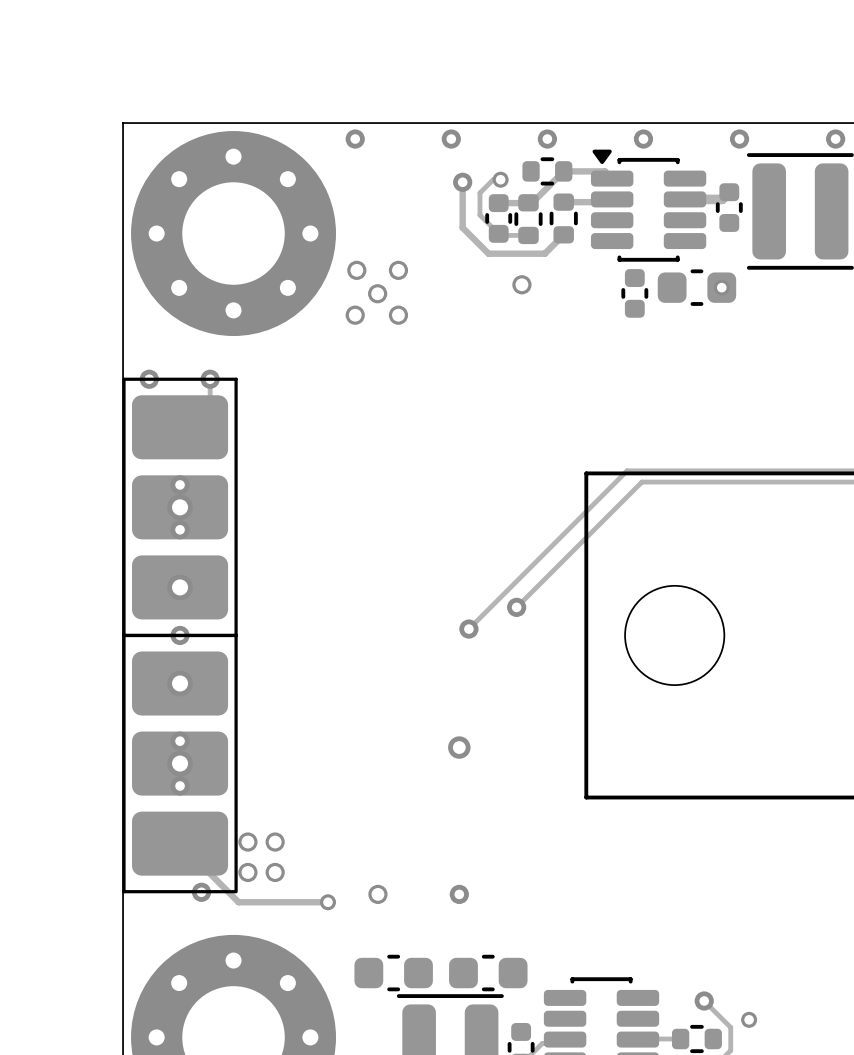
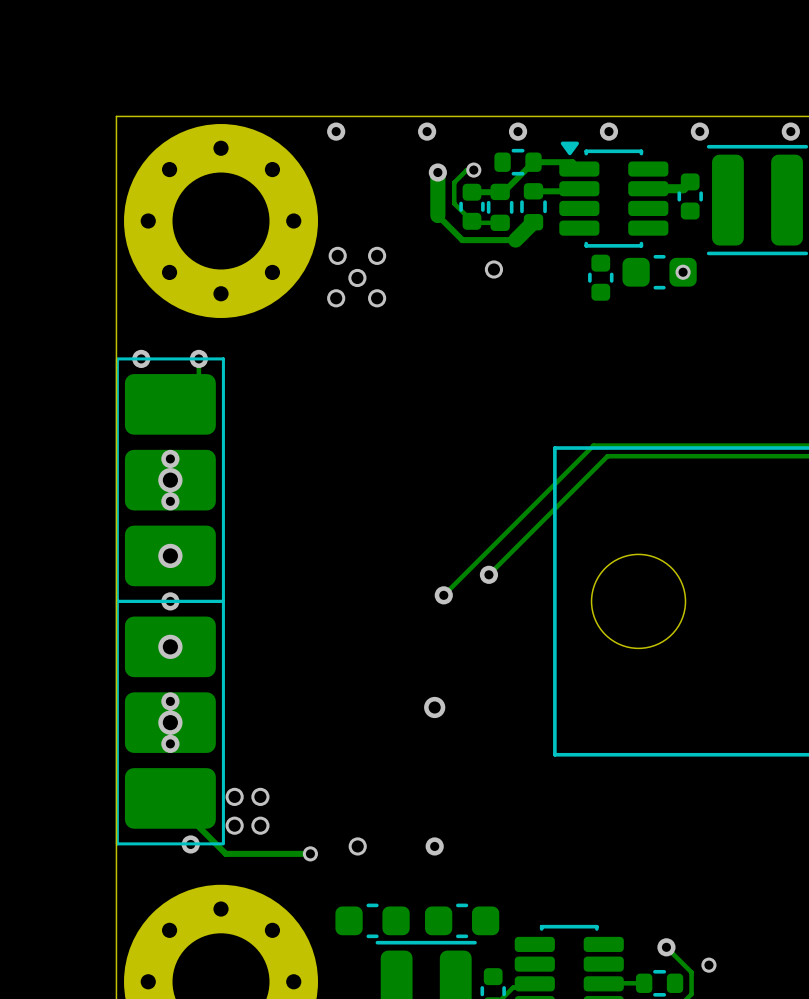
track width: thin (462, 182) (462, 227) -> thick (437, 172) (437, 215)
track width: thin (563, 234) (544, 253) -> thick (533, 222) (515, 240)

